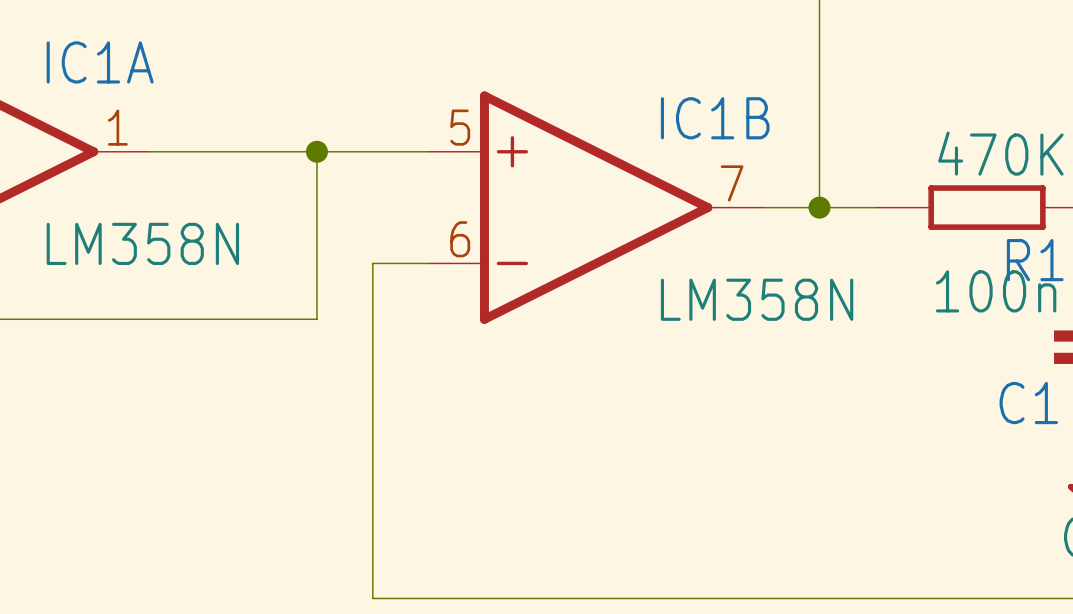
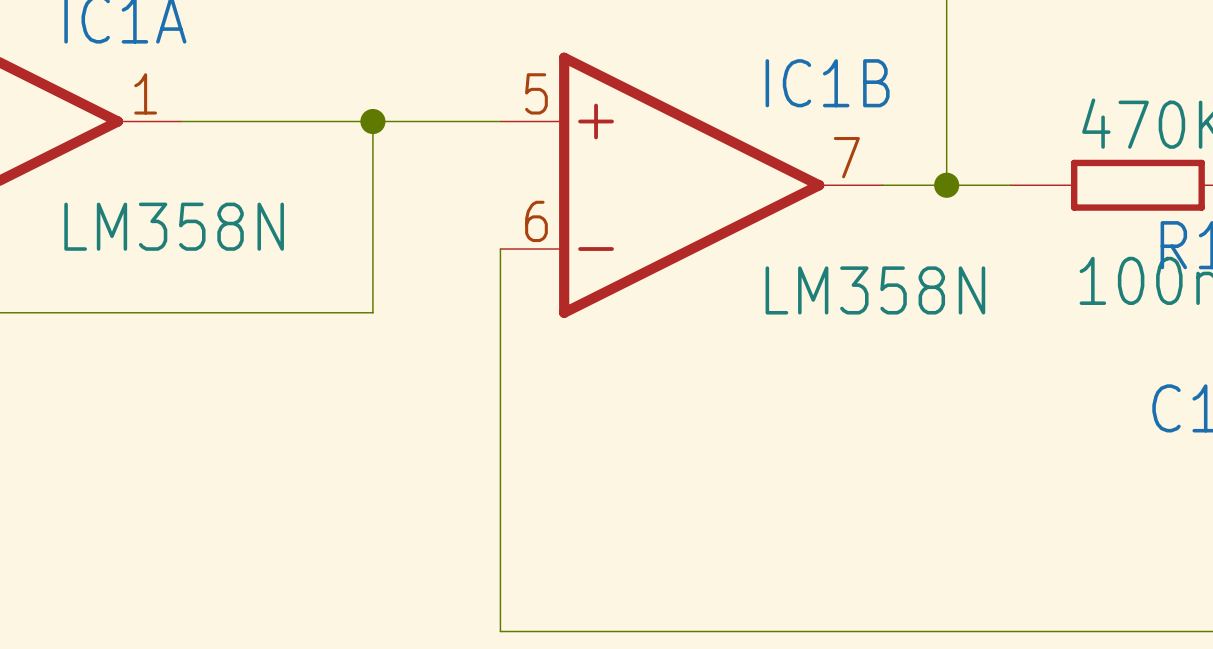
wire: (428, 263) (372, 263) (372, 598) (428, 598) -> (500, 249) (500, 631)

